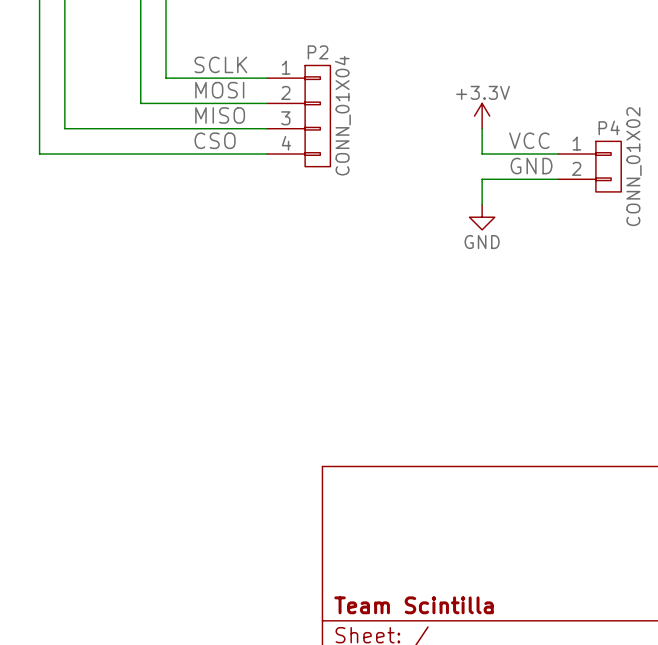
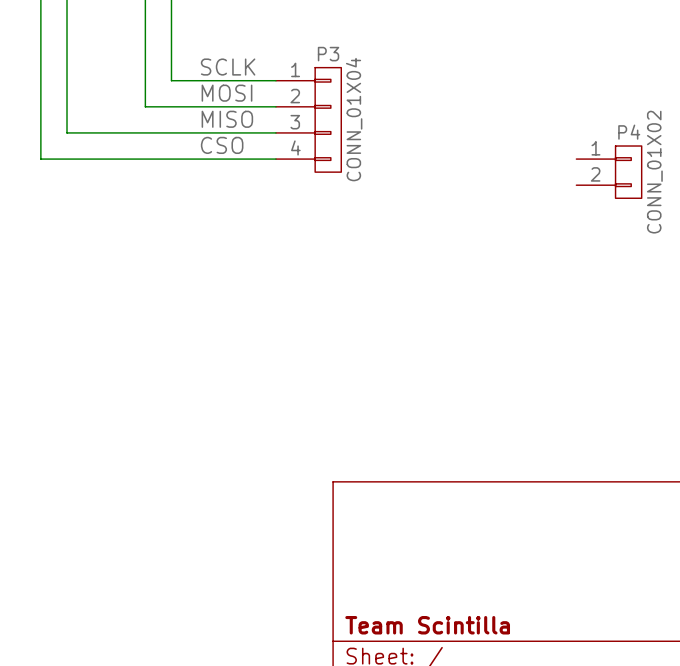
P2 name: P2 (318, 52) -> P3 (328, 54)
power symbol: +3.3V (482, 116) -> none
wire: (482, 128) (482, 154) (557, 154) -> none
label: VCC (529, 140) -> none
label: GND (531, 166) -> none
wire: (557, 179) (482, 179) (482, 204) -> none
power symbol: GND (482, 217) -> none

